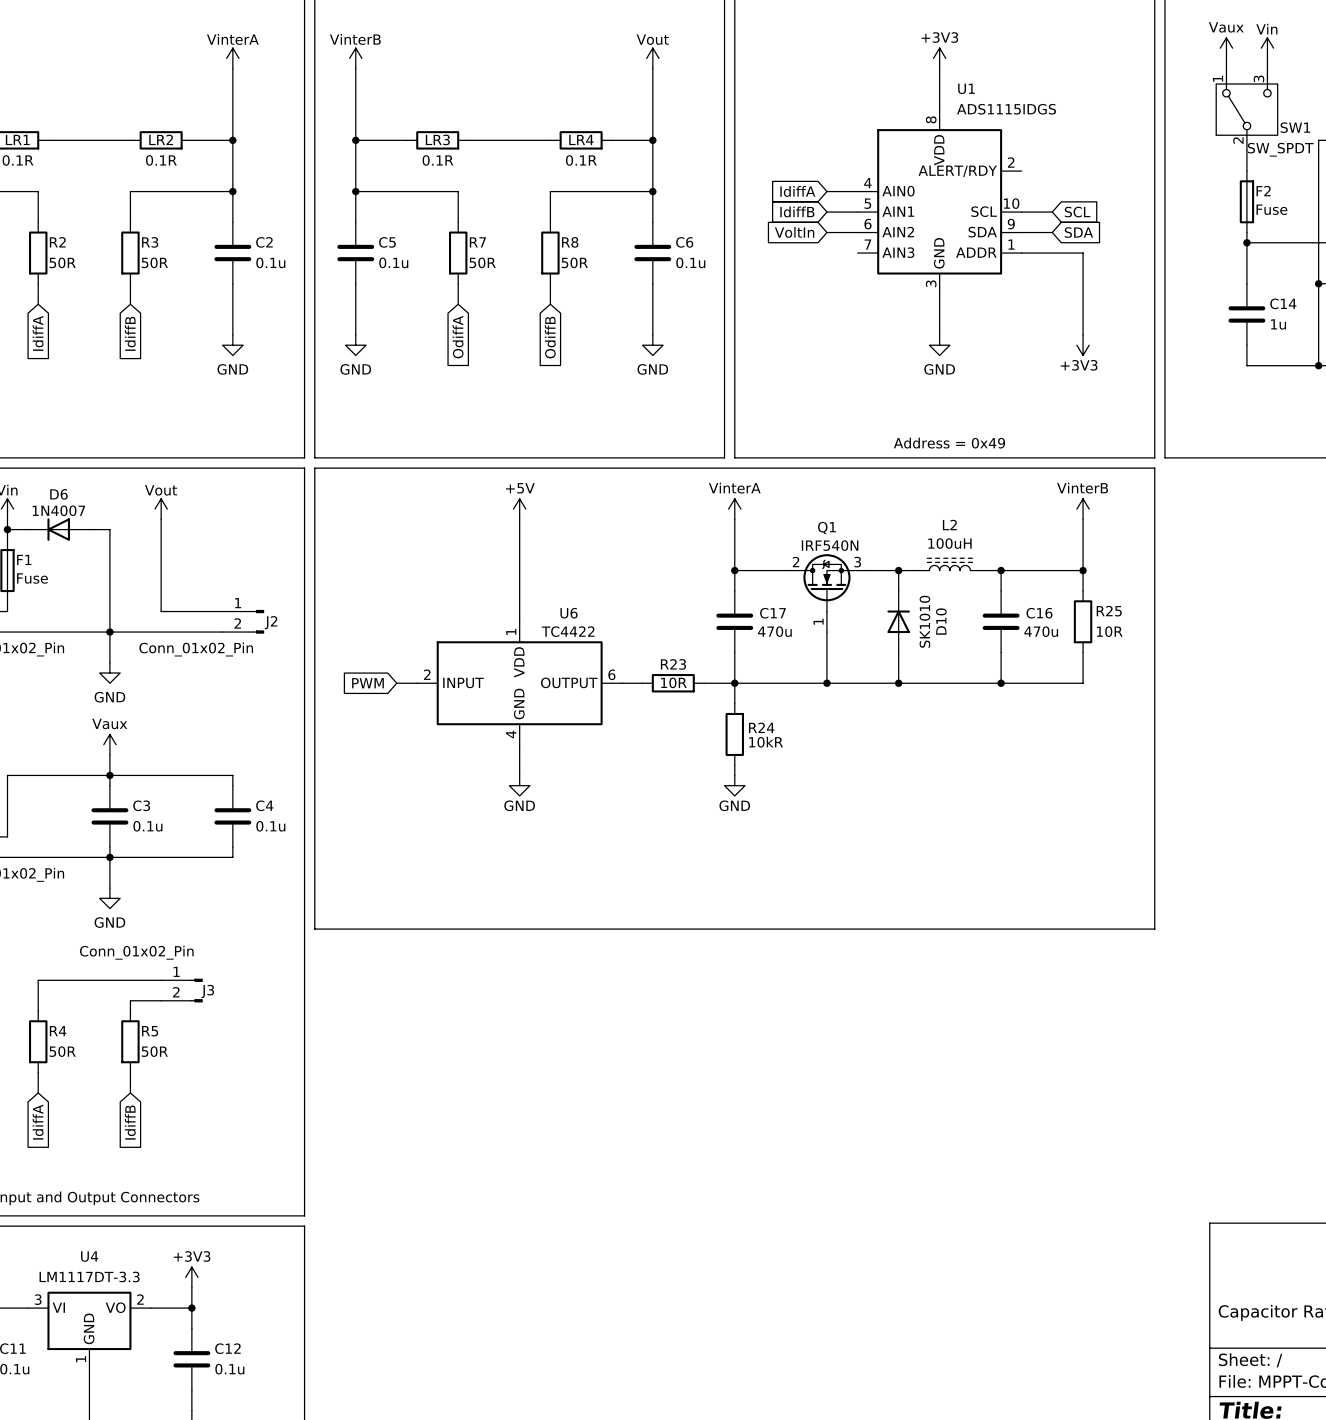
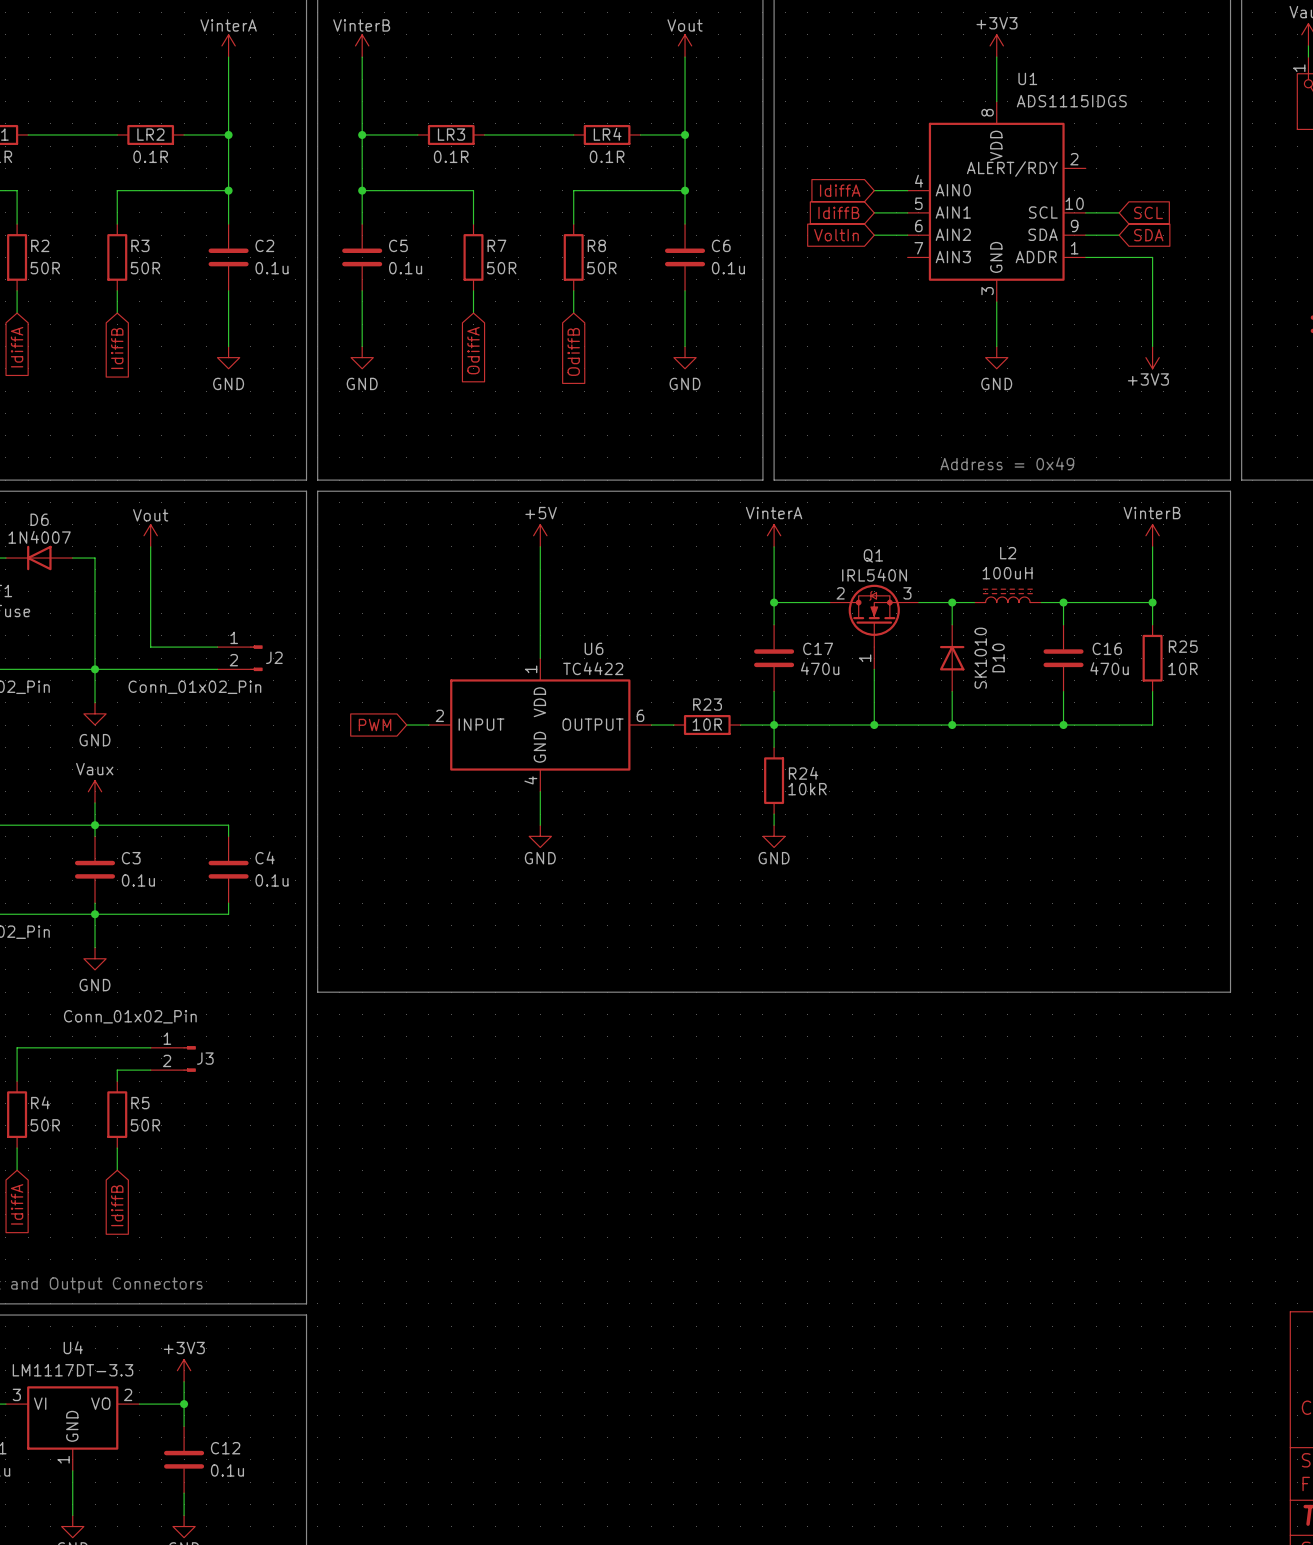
Q1 value: IRF540N (830, 545) -> IRL540N (874, 575)

